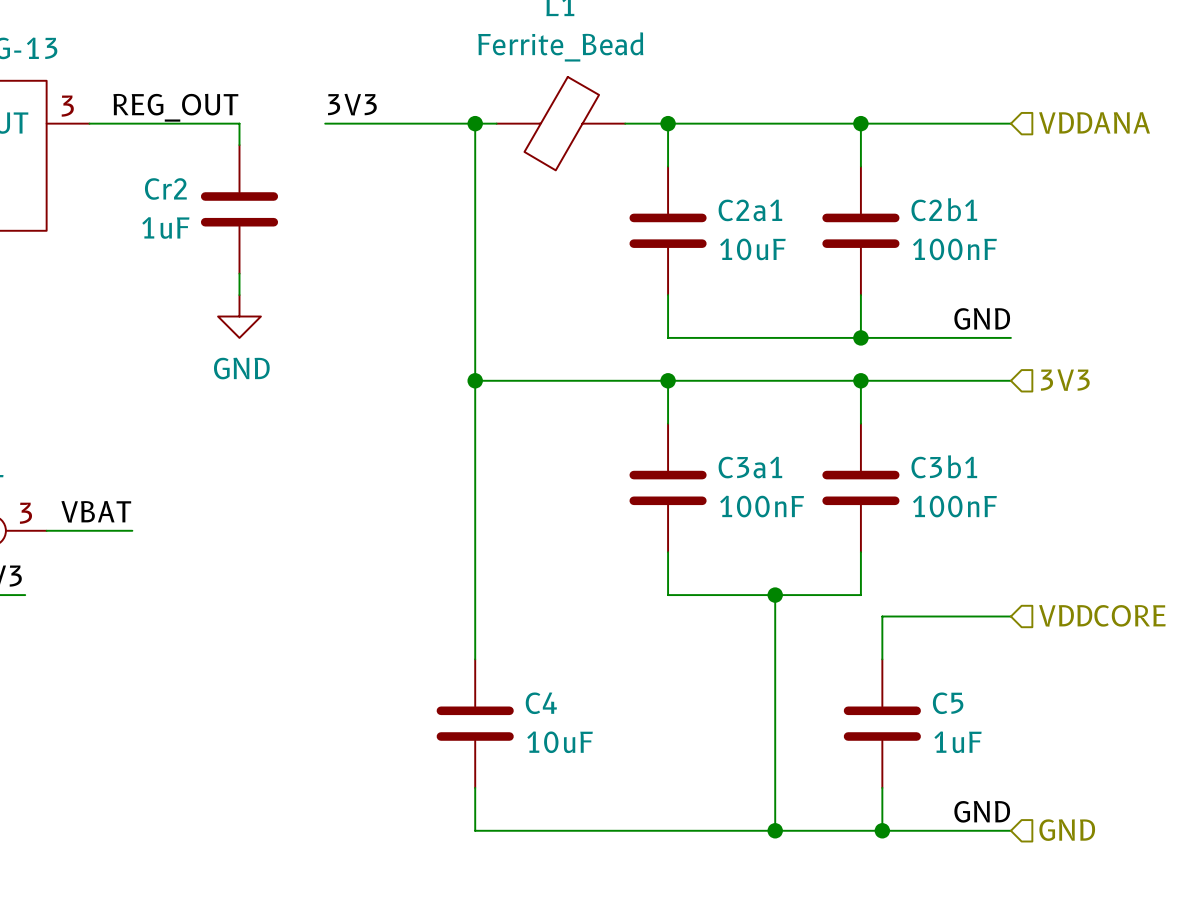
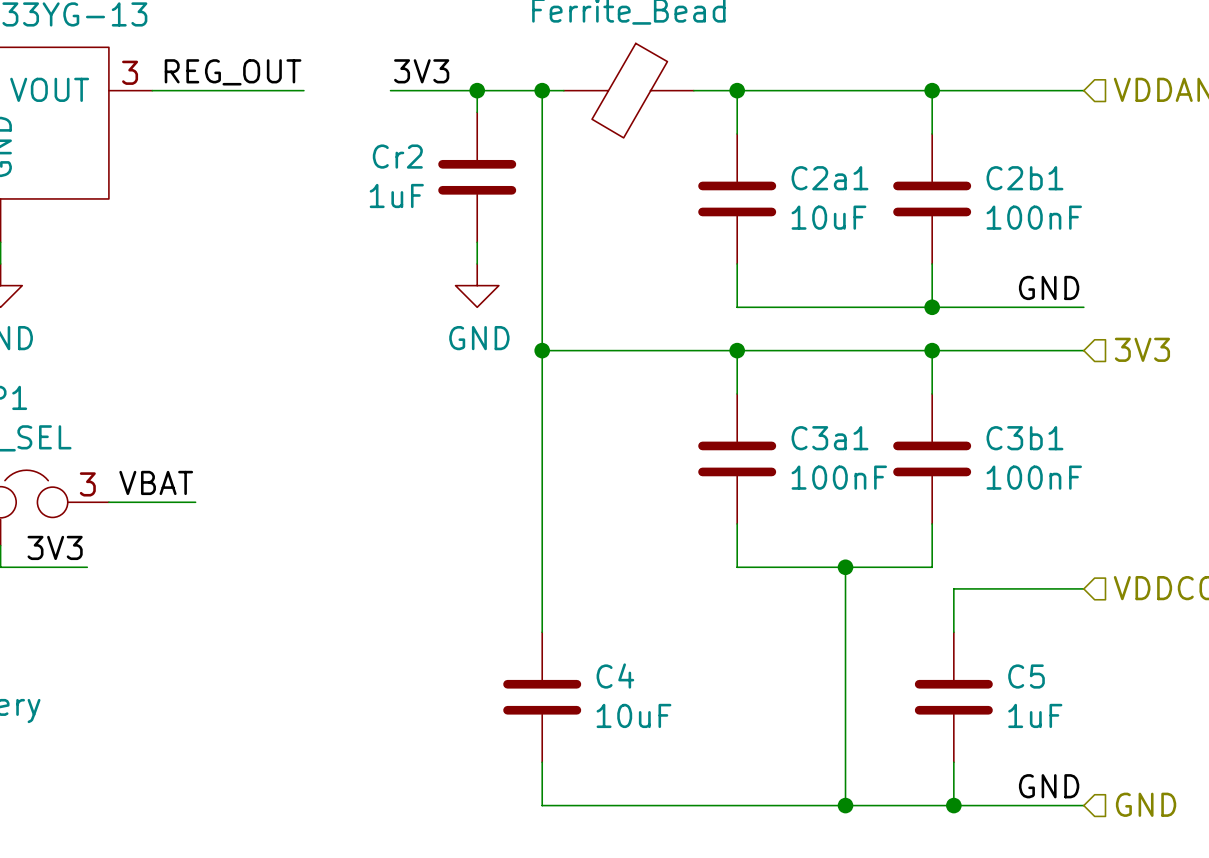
wire: (239, 123) (239, 145) -> (477, 90) (477, 112)
junction: none -> (477, 90)
Cr2 position: (239, 209) -> (477, 177)
wire: (239, 273) (239, 295) -> (477, 242) (477, 263)
power symbol position: GND (239, 316) -> GND (477, 285)

